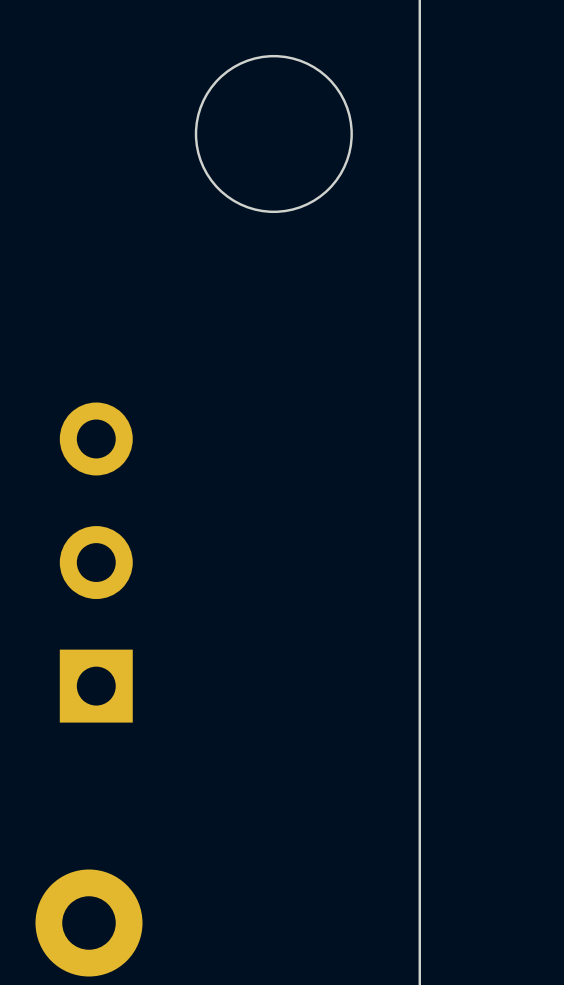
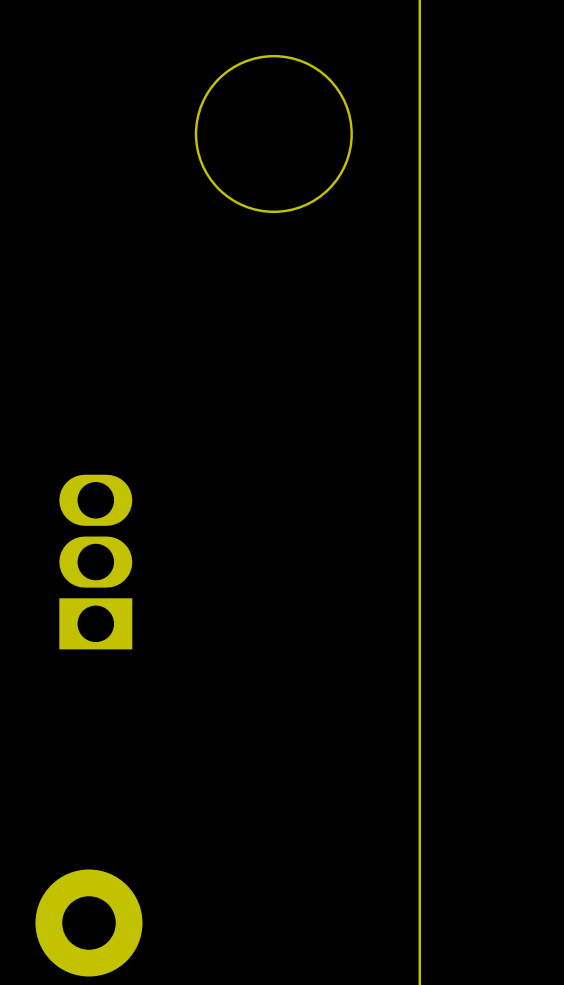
part footprint: [59, 402, 133, 723] -> [59, 474, 133, 650]

